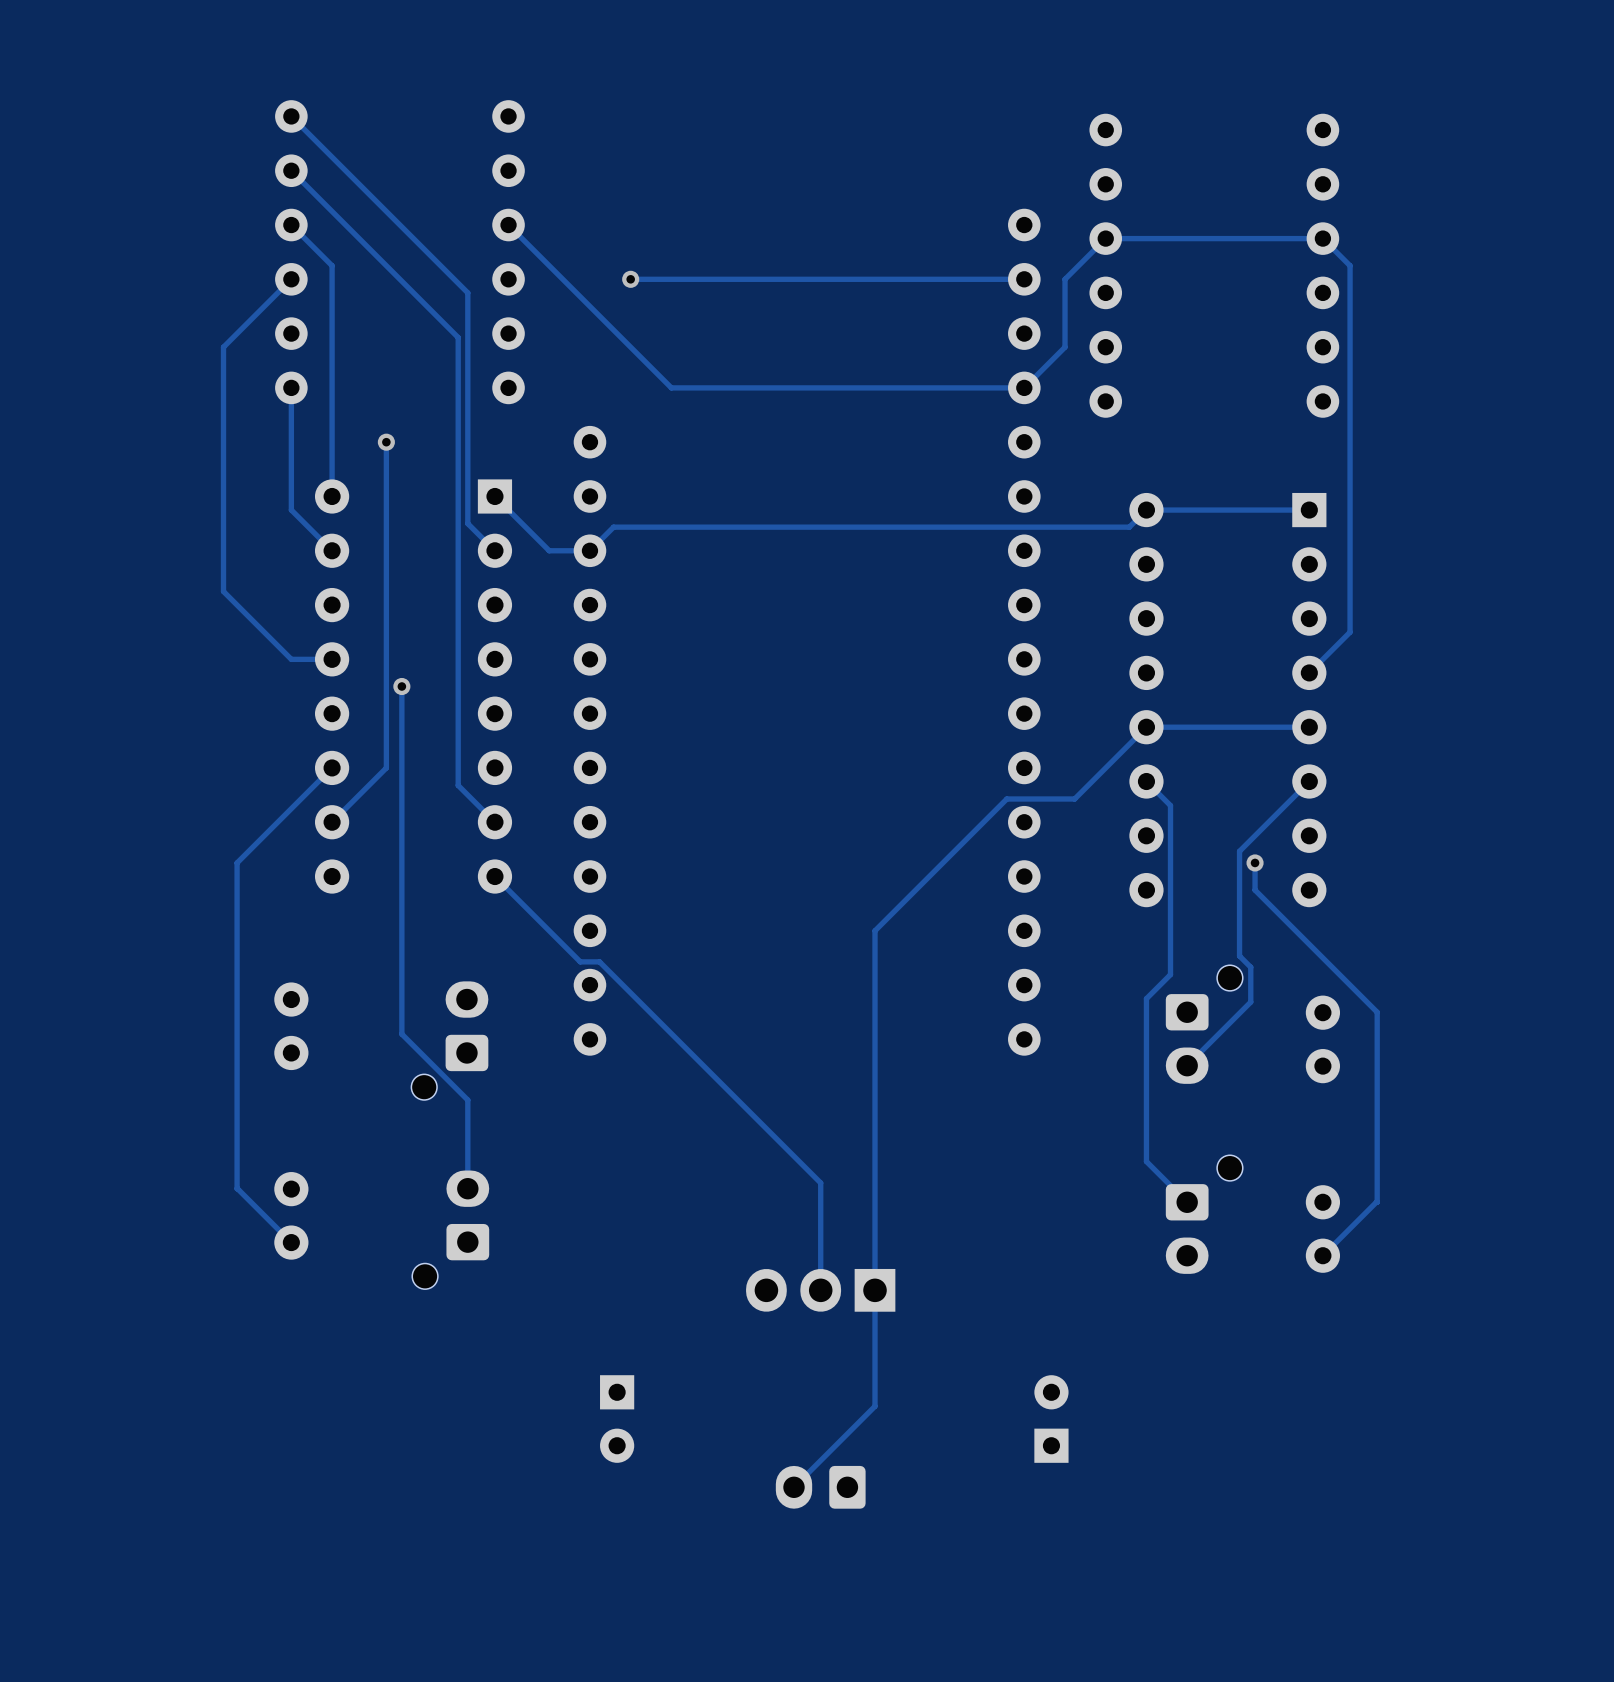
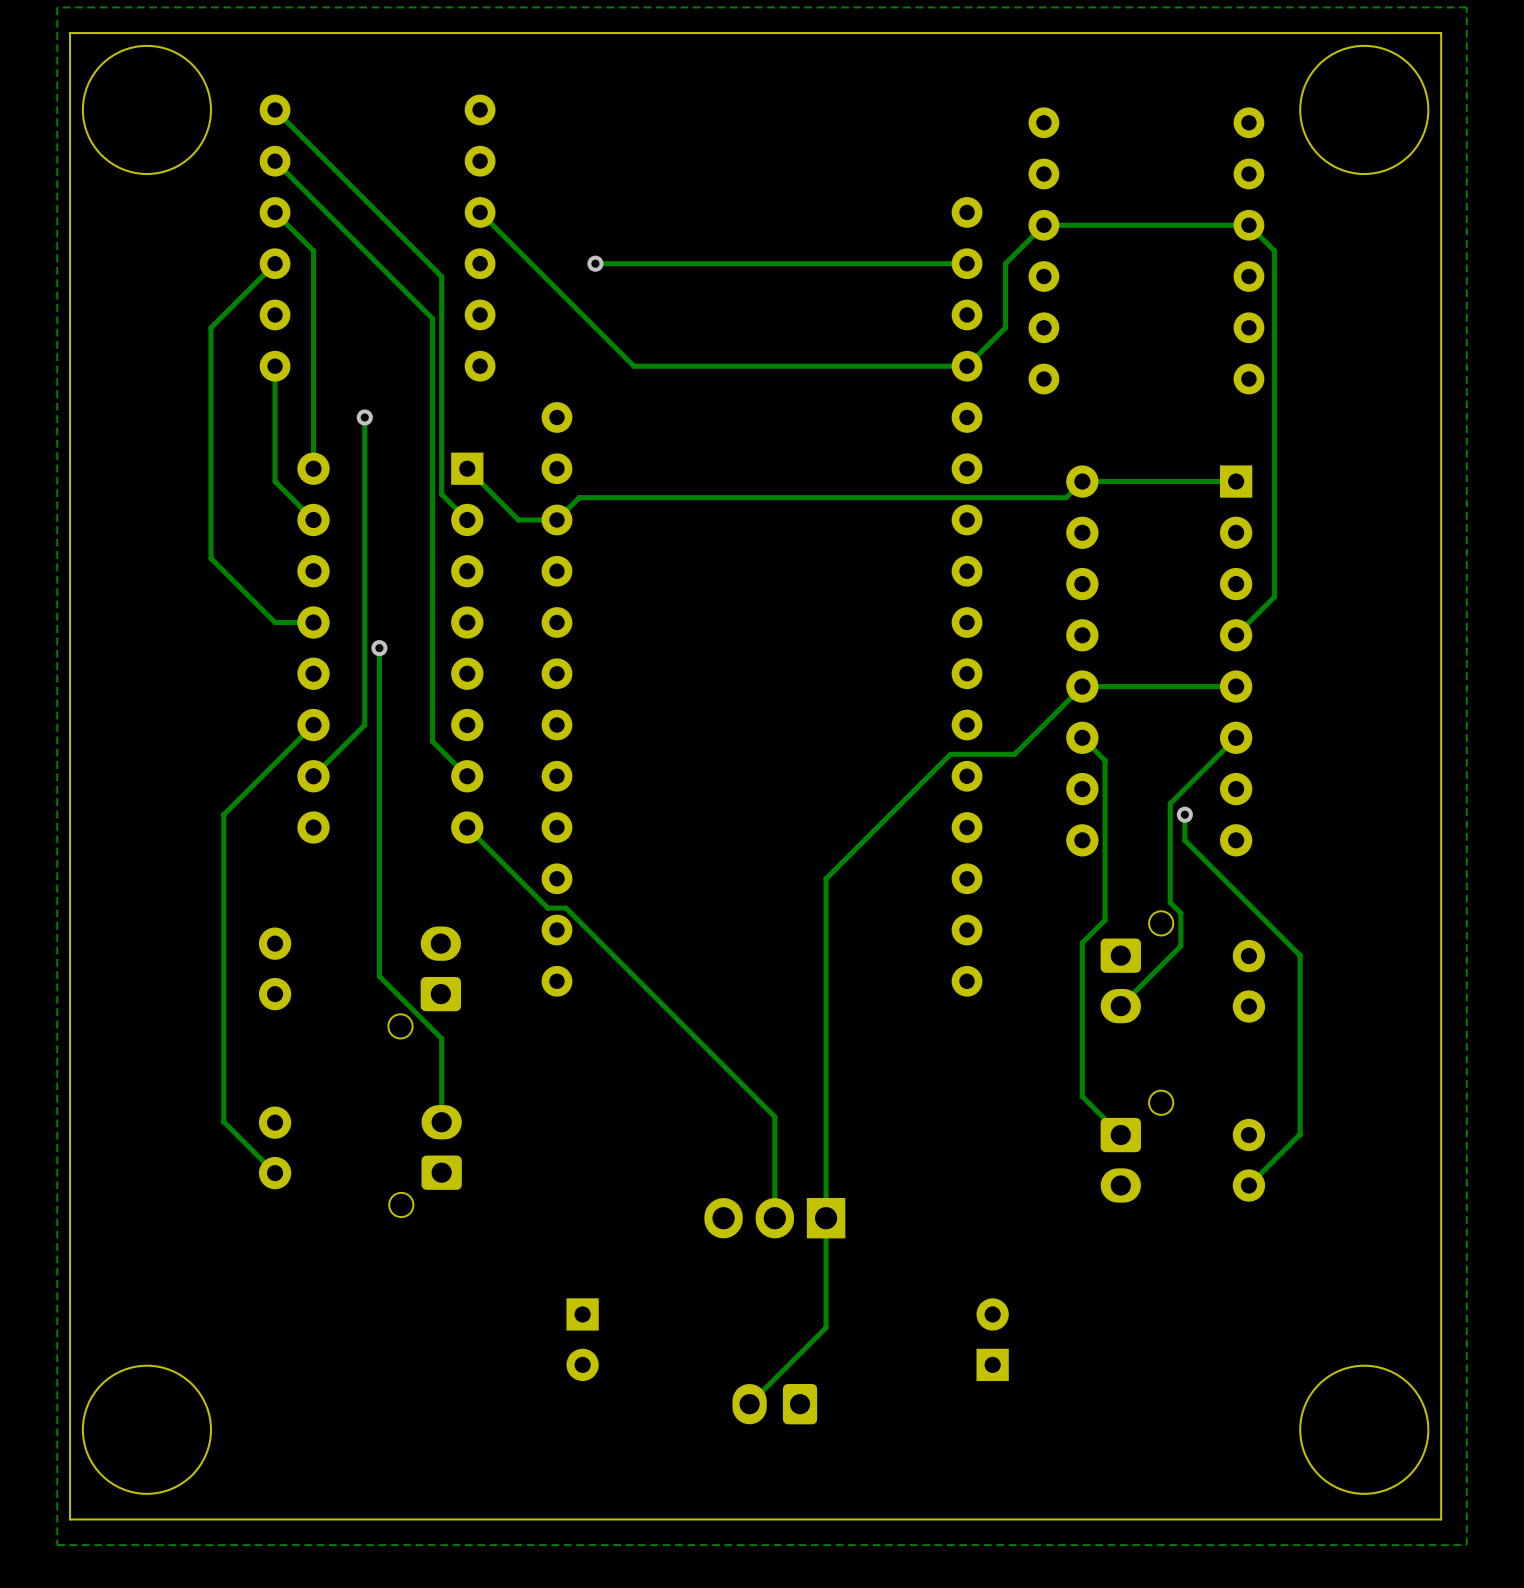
zone outline: none -> (1466, 7) (57, 7) (57, 1545) (1466, 1545) (1466, 7)
board edge: none -> (1441, 33) (70, 33) (70, 1519) (1441, 1519) (1441, 33)
round board edge: none -> [81, 44, 213, 176]
round board edge: none -> [1299, 44, 1430, 176]
round board edge: none -> [81, 1364, 213, 1495]
round board edge: none -> [1299, 1364, 1430, 1495]

